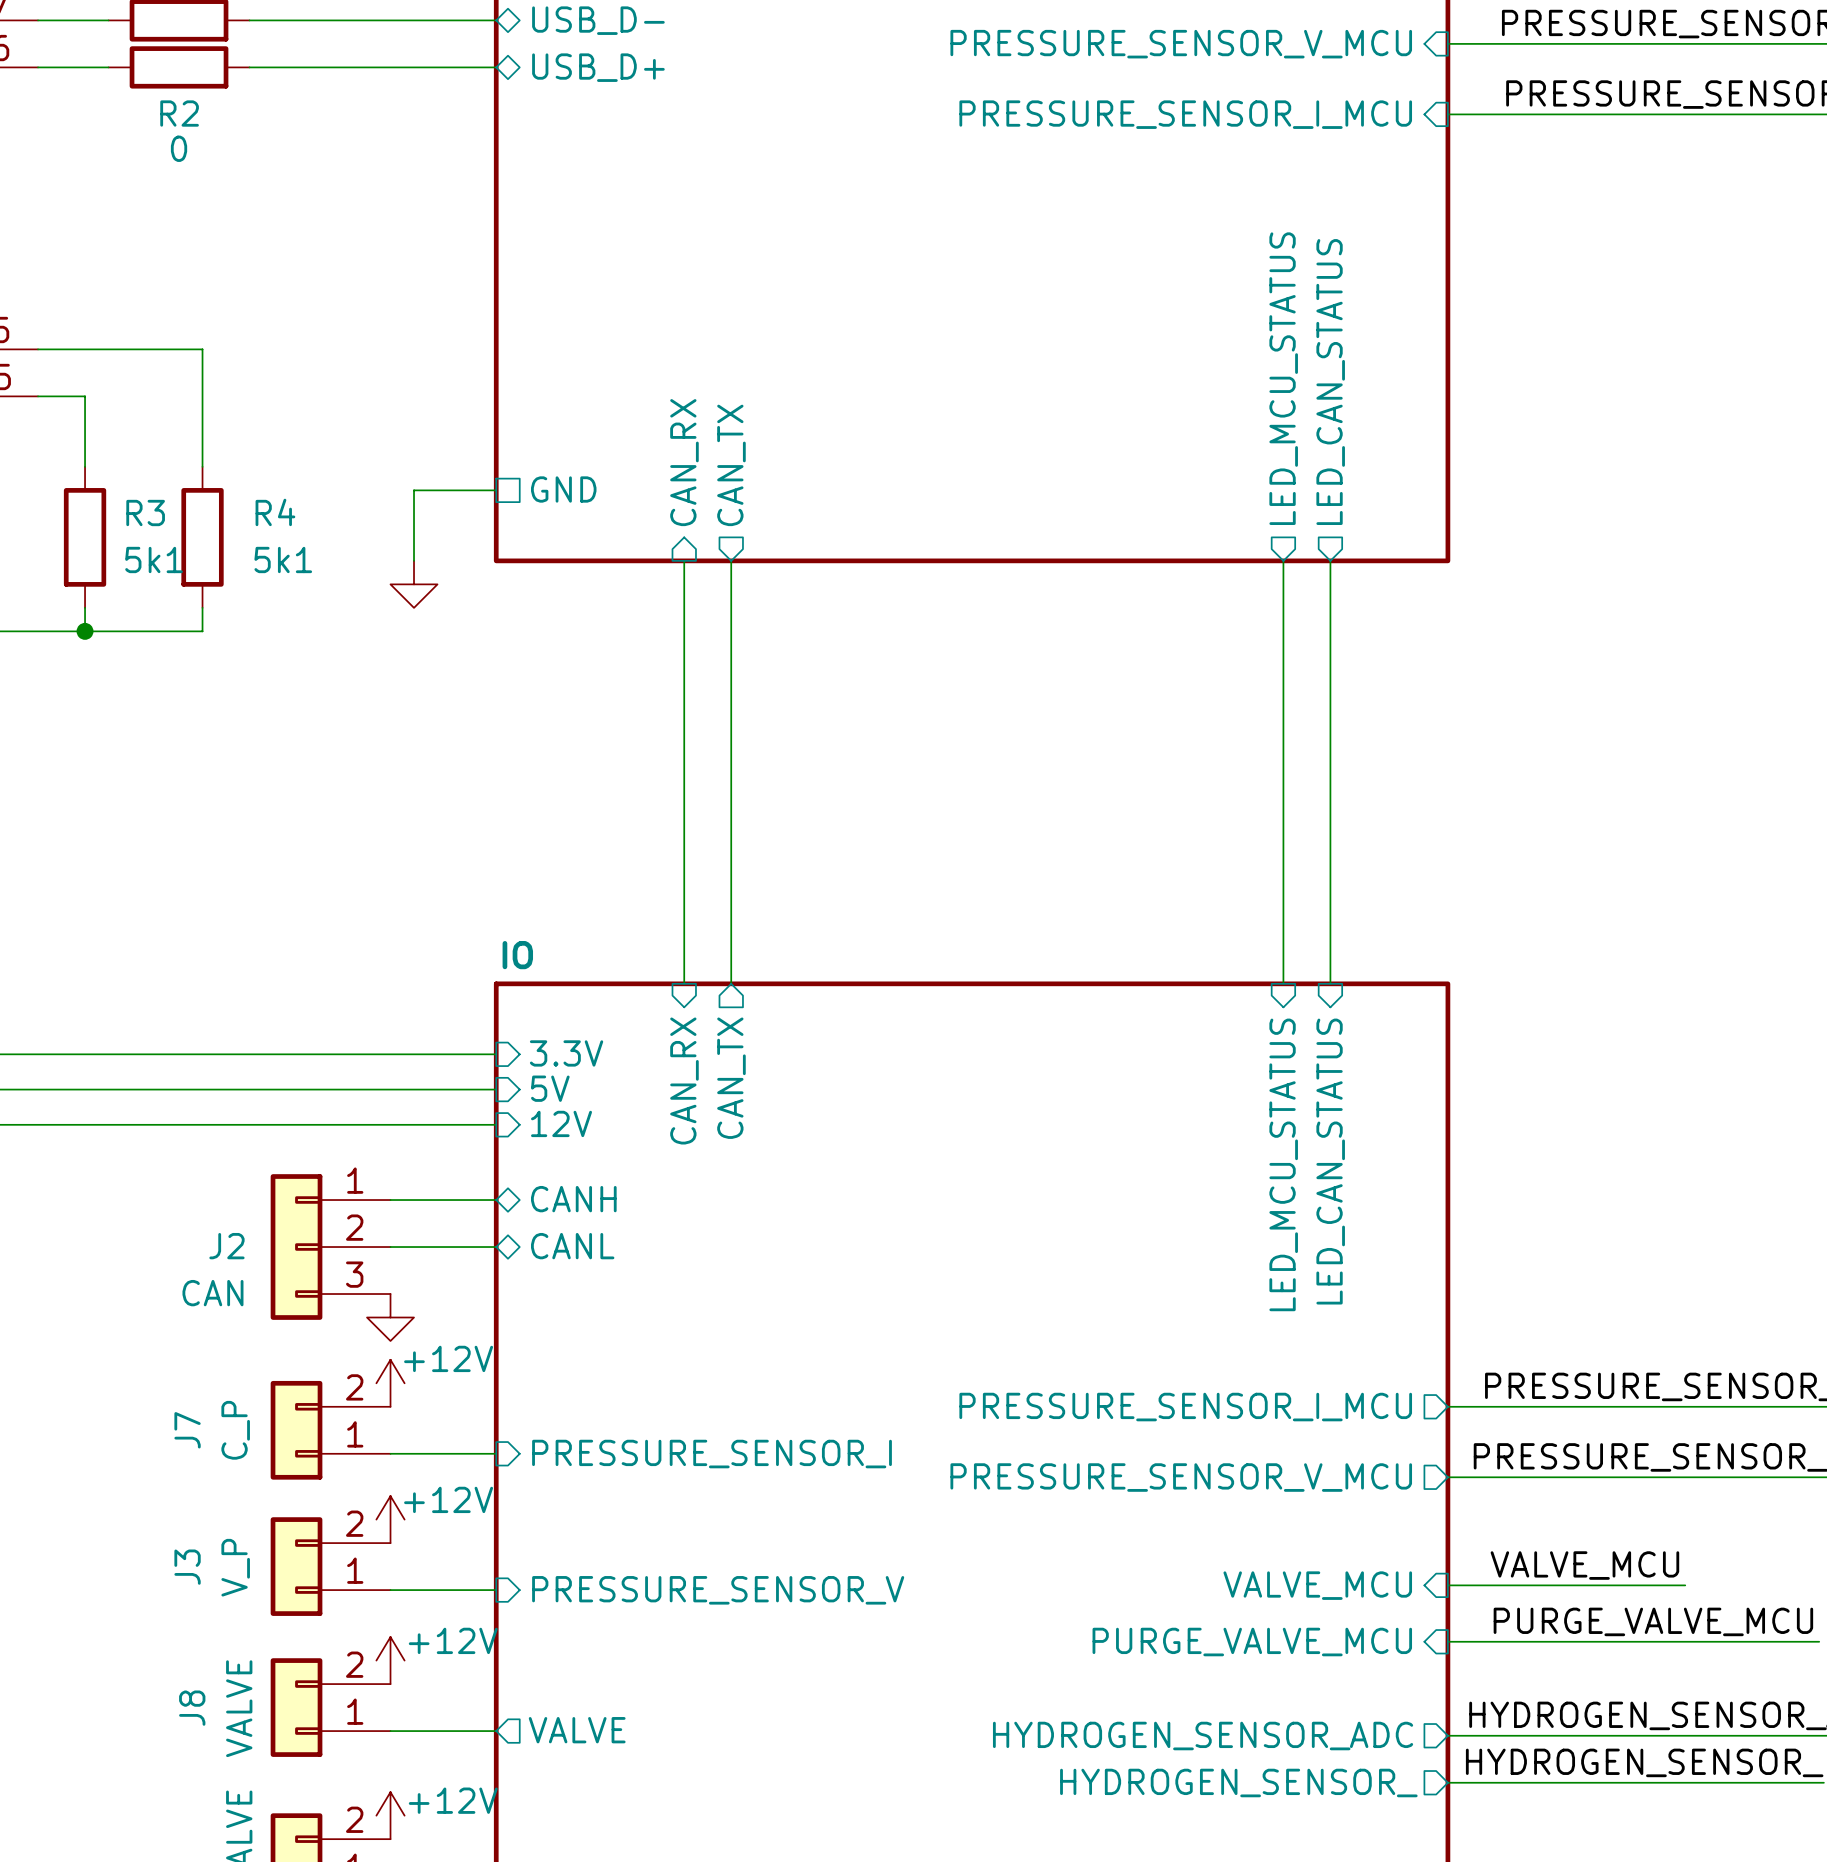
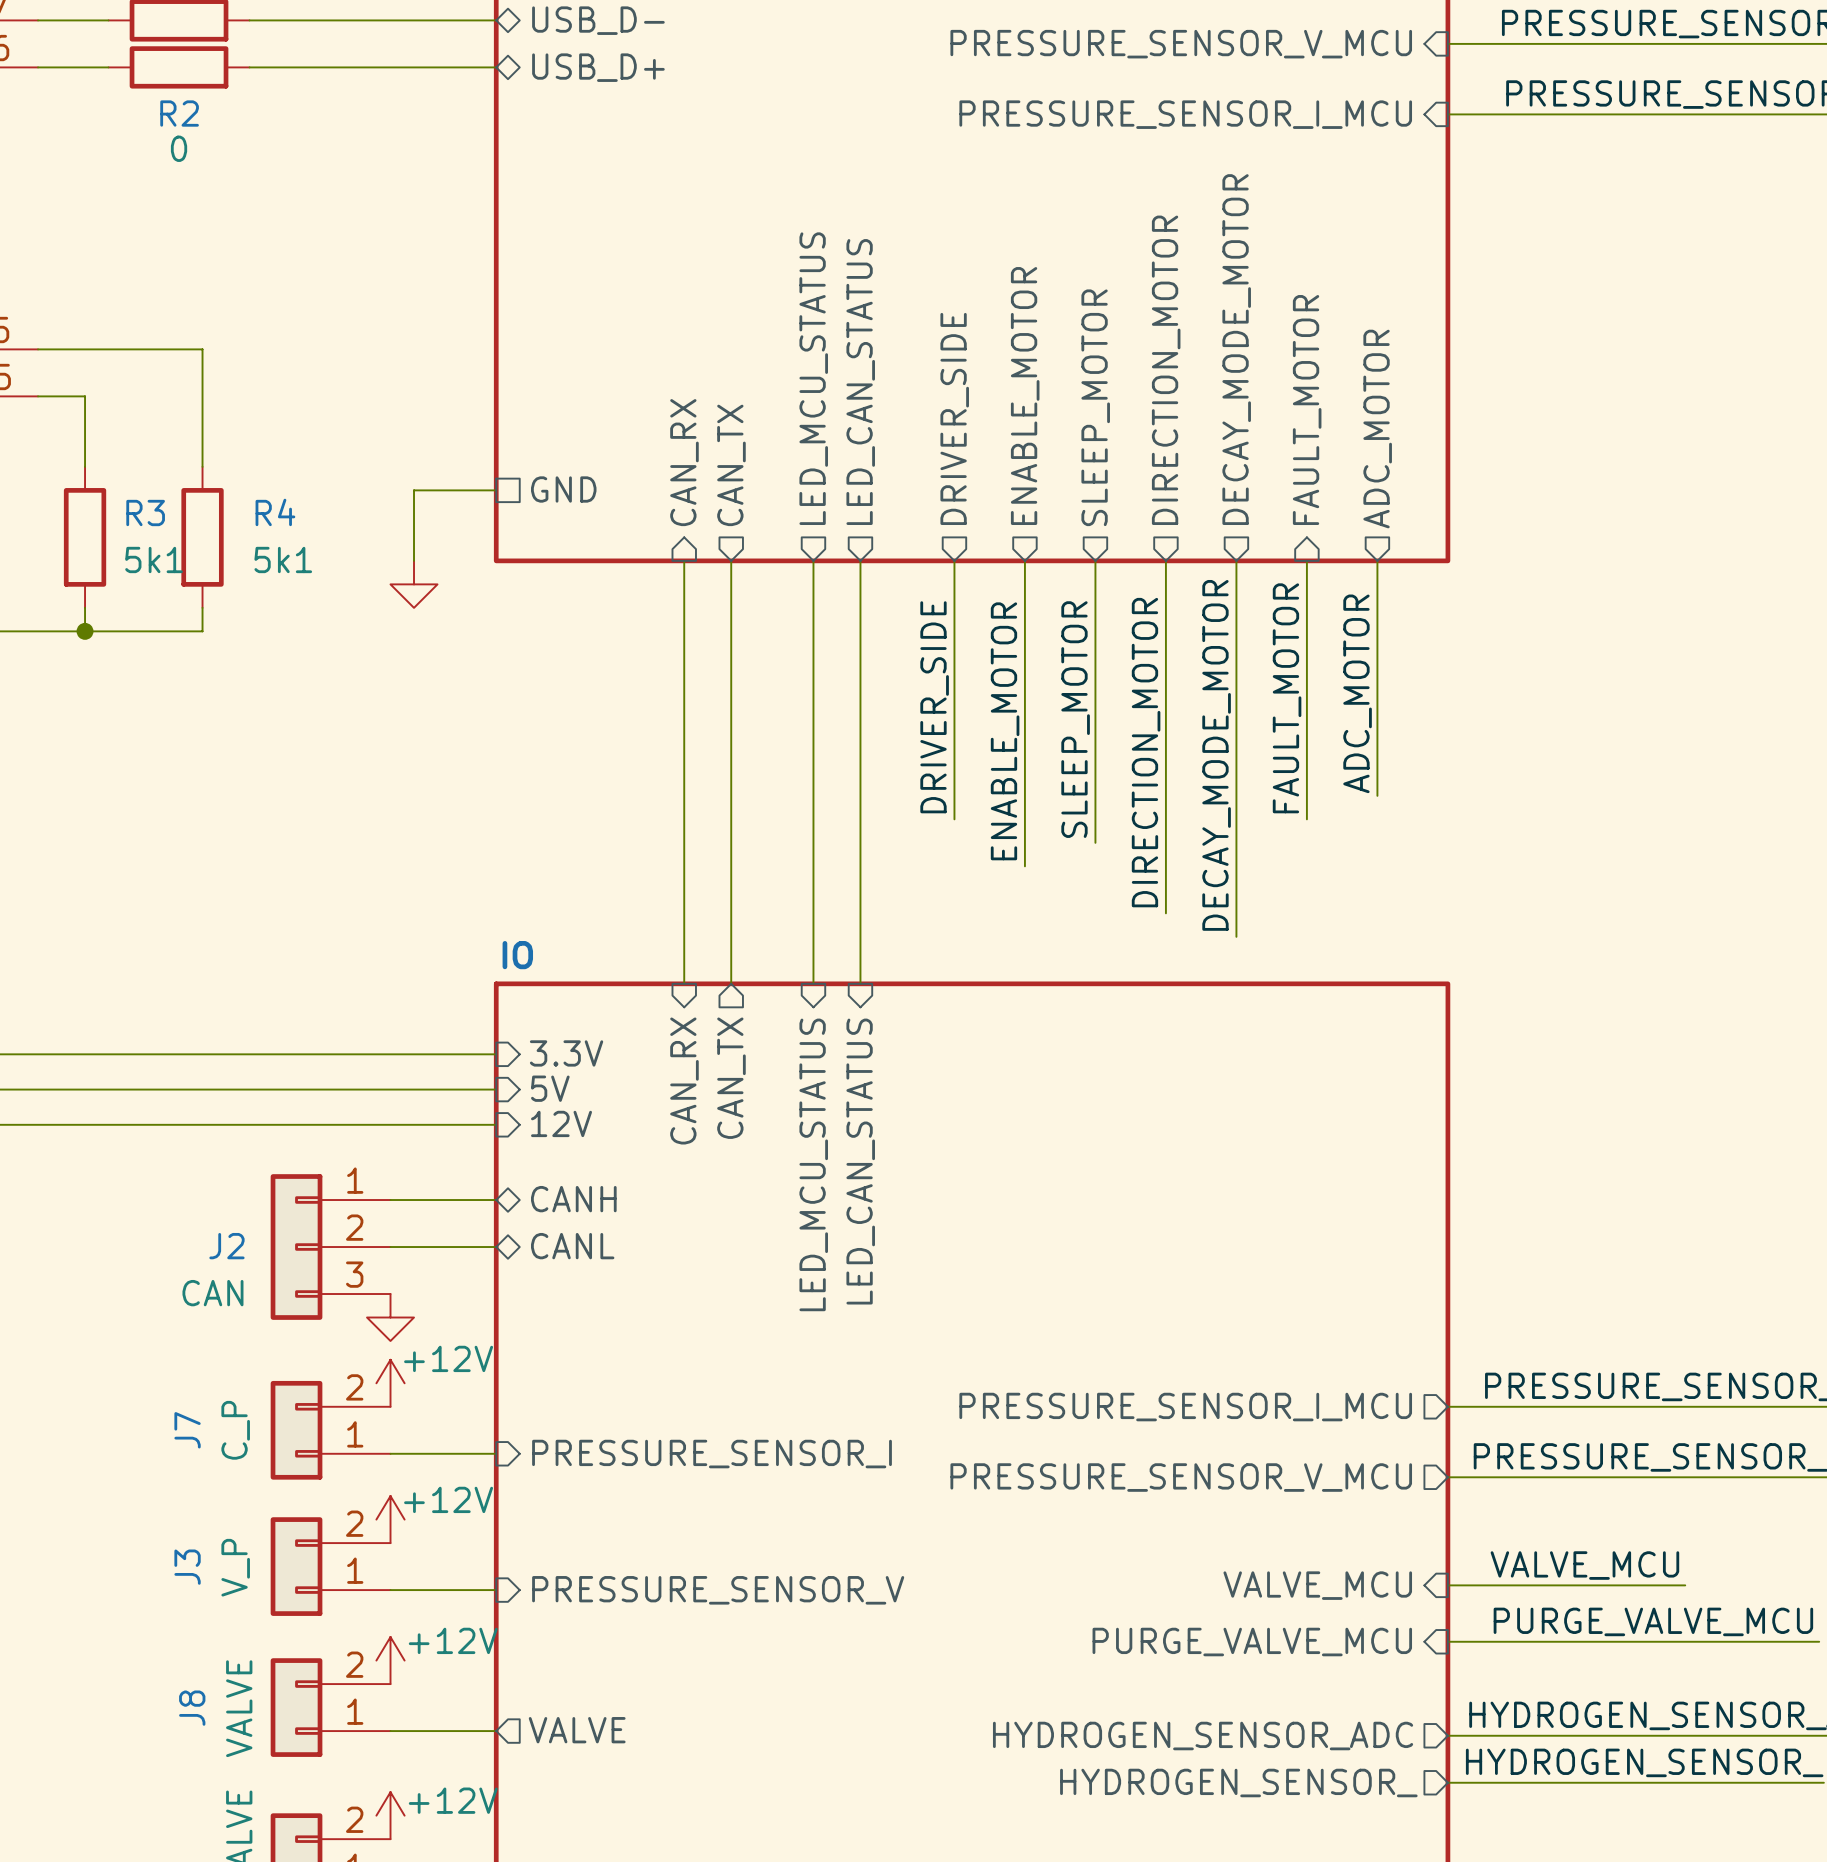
sheet pin: none -> DECAY_MODE_MOTOR (1236, 349)
sheet pin: none -> DIRECTION_MOTOR (1166, 370)
sheet pin: none -> LED_MCU_STATUS (813, 378)
sheet pin: LED_MCU_STATUS (1283, 378) -> none
sheet pin: none -> LED_CAN_STATUS (860, 382)
sheet pin: LED_CAN_STATUS (1330, 382) -> none
sheet pin: none -> ENABLE_MOTOR (1025, 396)
sheet pin: none -> SLEEP_MOTOR (1095, 407)
sheet pin: none -> FAULT_MOTOR (1307, 410)
sheet pin: none -> DRIVER_SIDE (954, 418)
sheet pin: none -> ADC_MOTOR (1377, 429)
wire: none -> (813, 560) (813, 983)
wire: none -> (954, 560) (954, 819)
wire: none -> (1024, 560) (1024, 866)
wire: none -> (1095, 560) (1095, 842)
wire: none -> (1165, 560) (1165, 913)
wire: none -> (1236, 560) (1236, 936)
wire: (1283, 560) (1283, 983) -> (860, 560) (860, 983)
wire: none -> (1306, 560) (1306, 819)
wire: (1330, 560) (1330, 983) -> none
wire: none -> (1377, 560) (1377, 795)
label: none -> ADC_MOTOR (1357, 693)
label: none -> FAULT_MOTOR (1287, 698)
label: none -> DRIVER_SIDE (934, 707)
label: none -> SLEEP_MOTOR (1075, 719)
label: none -> ENABLE_MOTOR (1005, 731)
label: none -> DIRECTION_MOTOR (1146, 752)
label: none -> DECAY_MODE_MOTOR (1216, 755)
sheet pin: none -> LED_CAN_STATUS (860, 1161)
sheet pin: LED_CAN_STATUS (1330, 1161) -> none
sheet pin: none -> LED_MCU_STATUS (813, 1164)
sheet pin: LED_MCU_STATUS (1283, 1164) -> none

